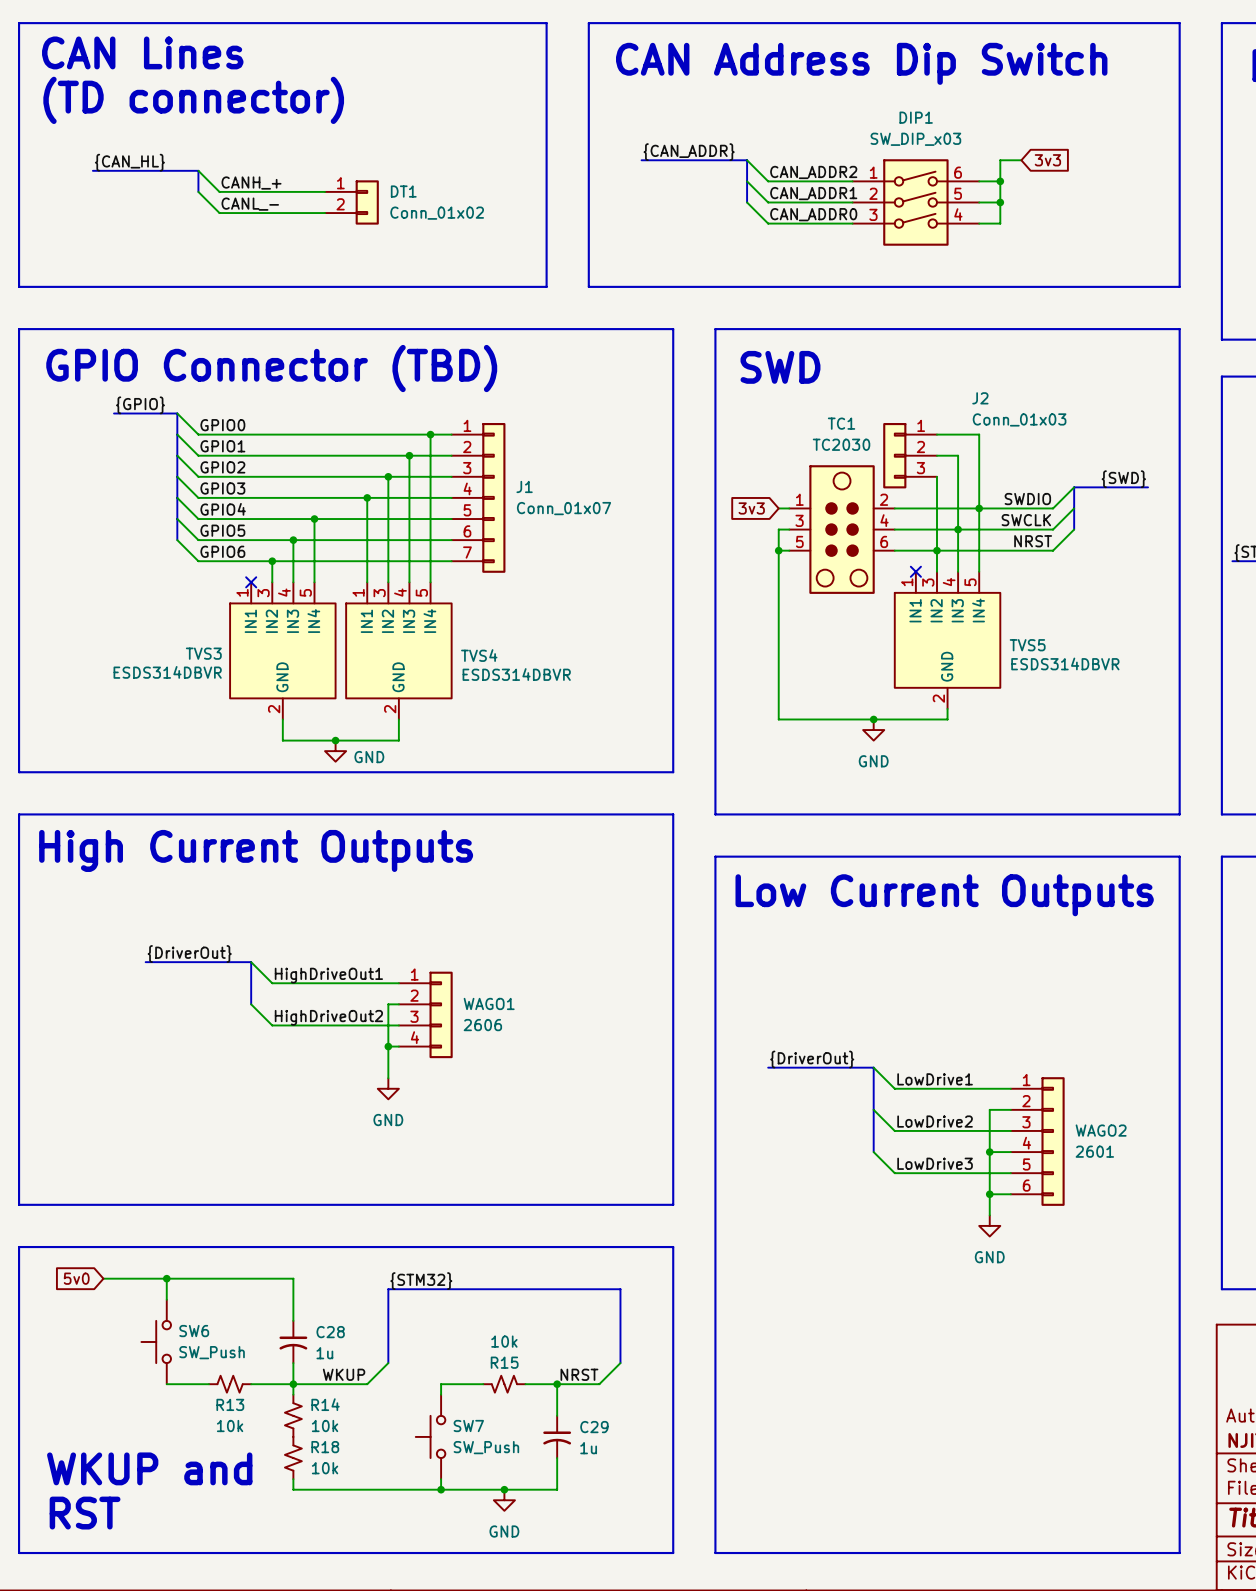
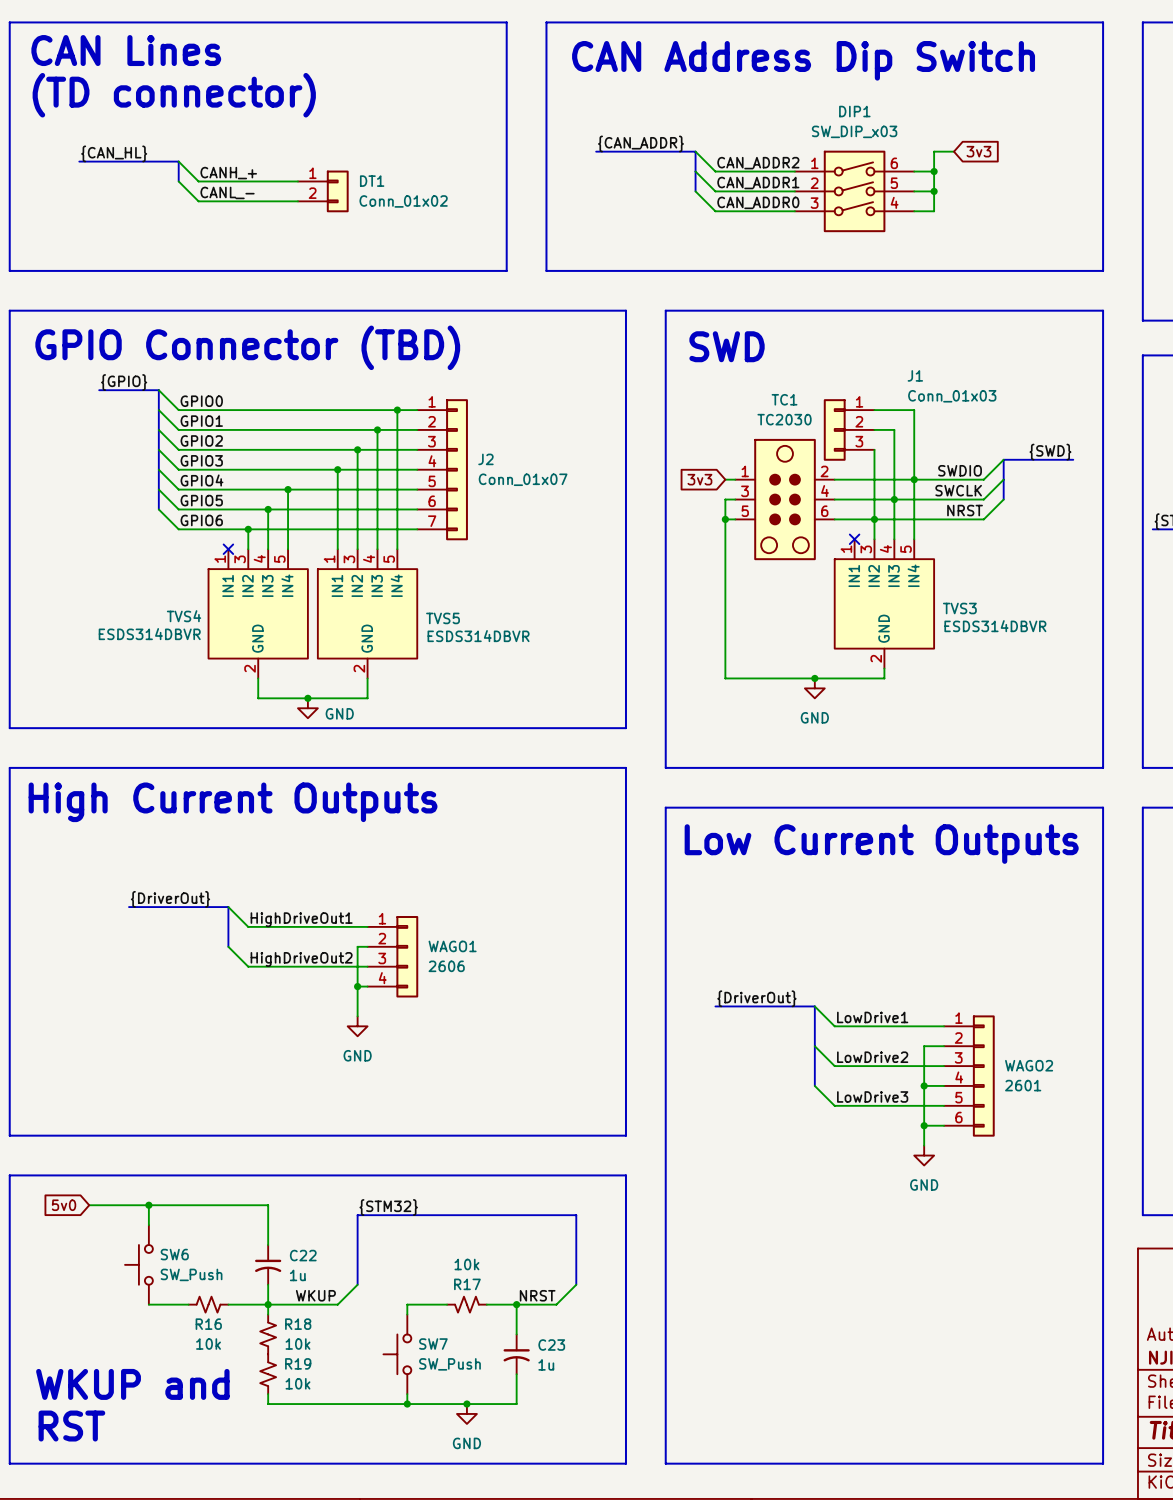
J2 name: J2 (980, 398) -> J1 (915, 375)
J1 name: J1 (524, 486) -> J2 (485, 459)
TVS5 name: TVS5 (1027, 645) -> TVS3 (959, 608)
TVS3 name: TVS3 (203, 653) -> TVS4 (184, 616)
TVS4 name: TVS4 (479, 655) -> TVS5 (443, 618)
C28 name: C28 (330, 1332) -> C22 (303, 1255)
R15 name: R15 (504, 1362) -> R17 (467, 1284)
R13 name: R13 (230, 1404) -> R16 (208, 1324)
R14 name: R14 (325, 1404) -> R18 (298, 1324)
C29 name: C29 (594, 1427) -> C23 (551, 1345)
R18 name: R18 (325, 1447) -> R19 (298, 1363)

